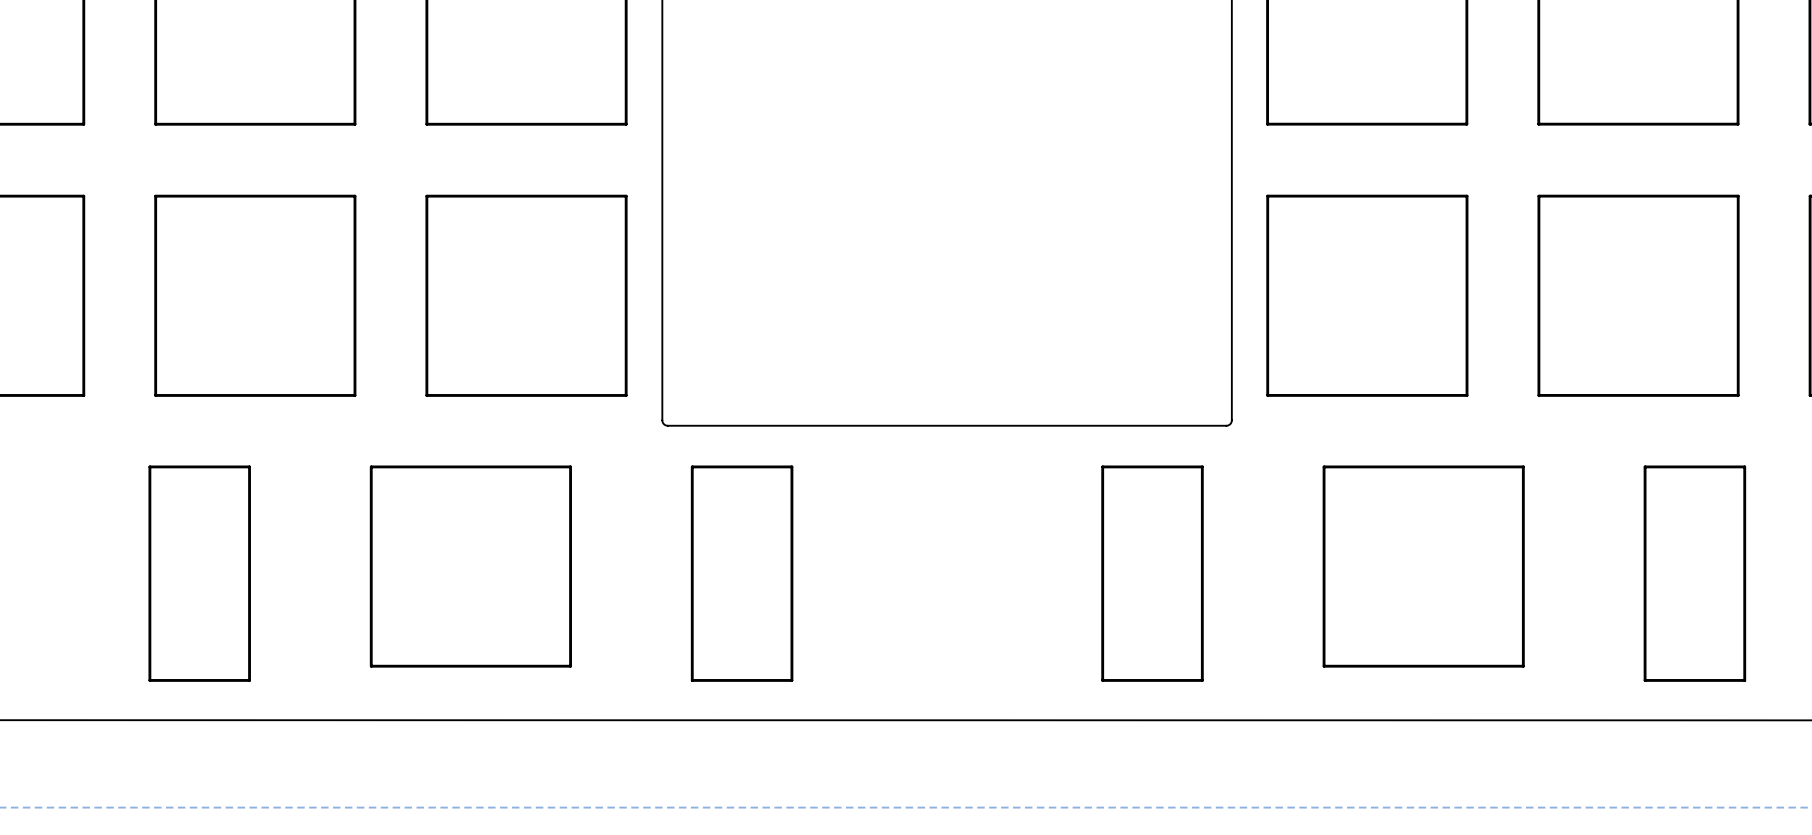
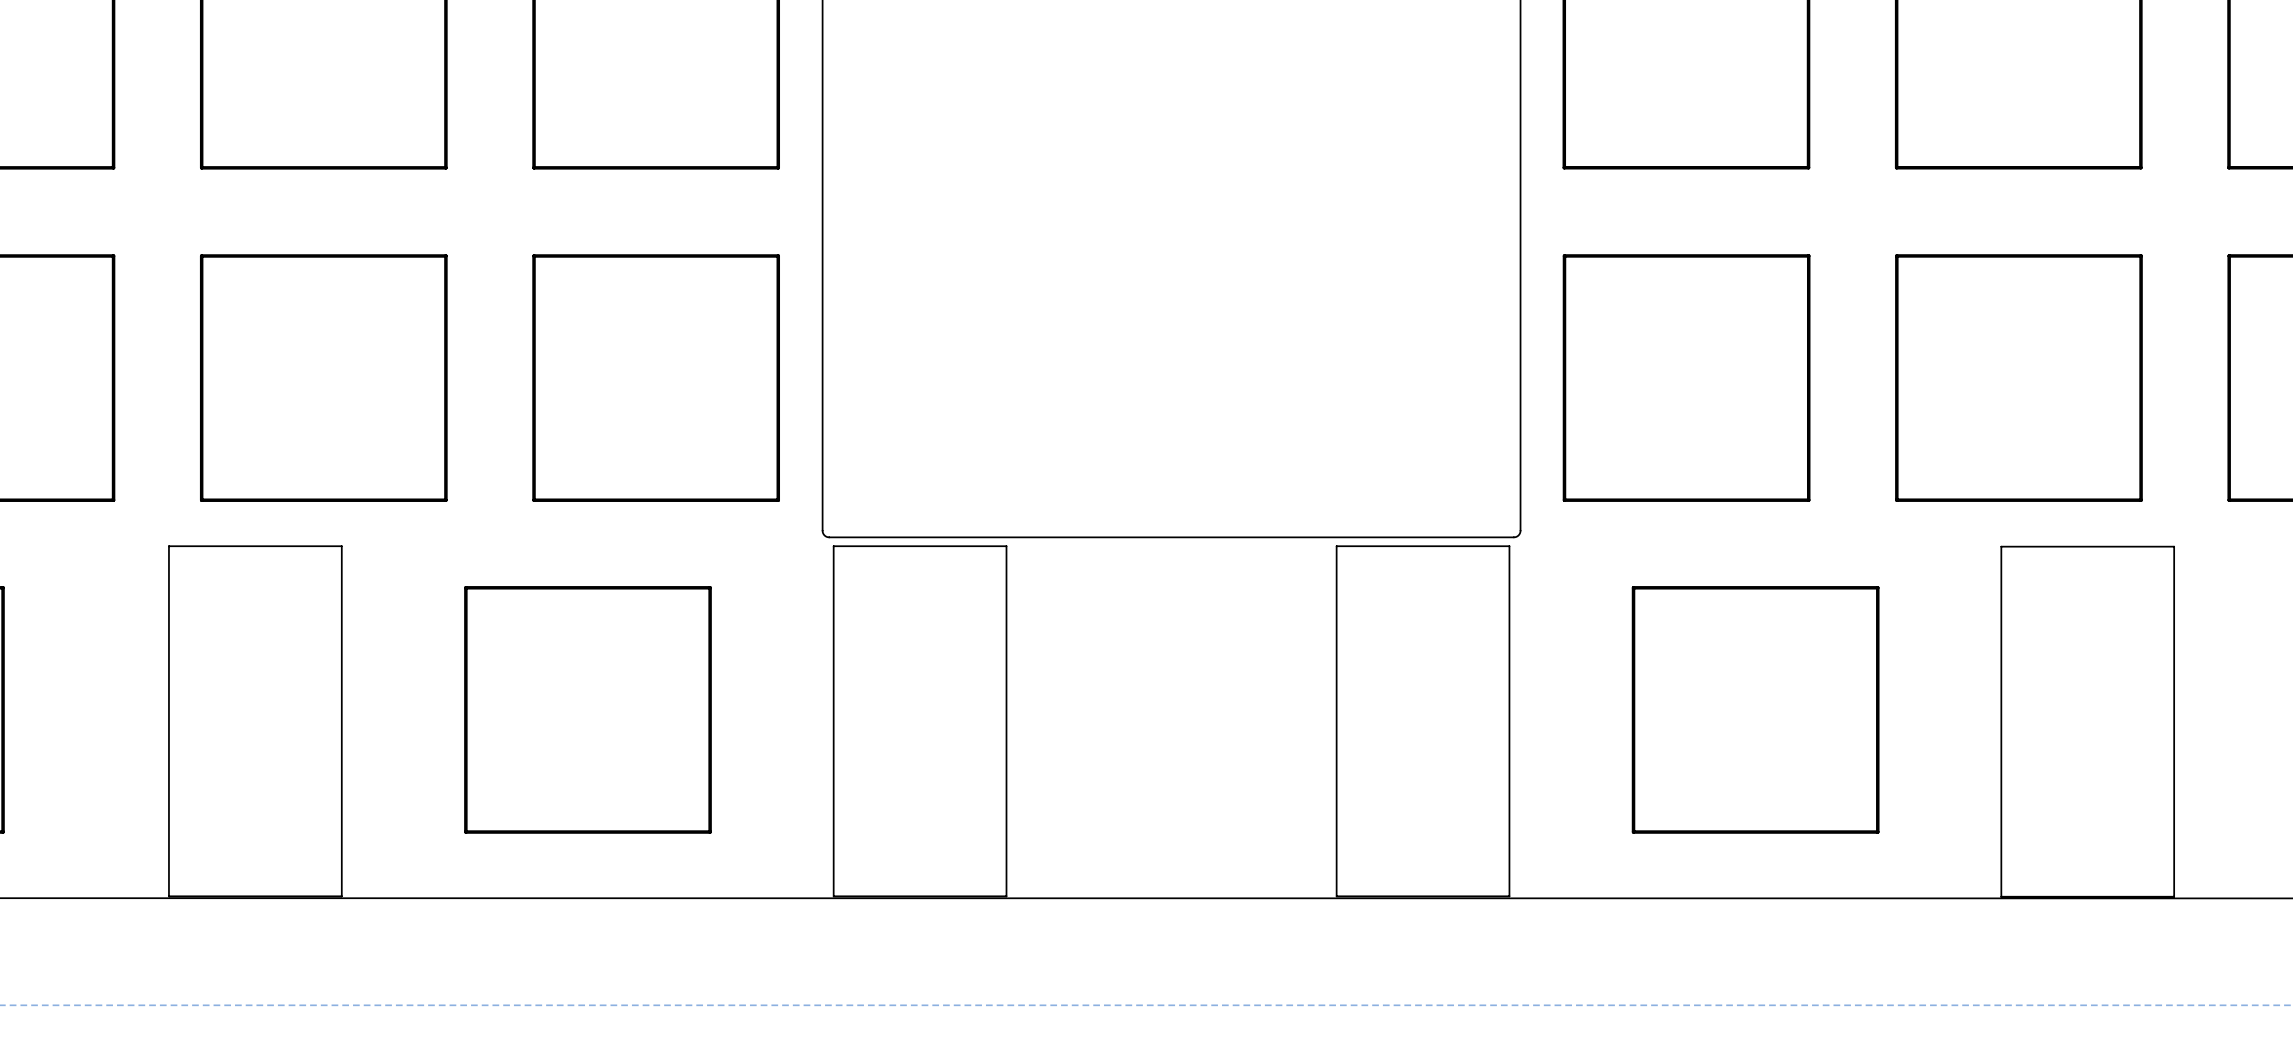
board edge: (249, 466) (149, 466) (149, 680) (249, 680) (249, 466) -> (341, 546) (341, 896) (168, 896) (168, 546) (341, 546)
board edge: (791, 466) (692, 466) (692, 680) (791, 680) (791, 466) -> (1006, 546) (1006, 896) (833, 896) (833, 546) (1006, 546)
board edge: (1202, 466) (1102, 466) (1102, 680) (1202, 680) (1202, 466) -> (1509, 546) (1509, 896) (1336, 896) (1336, 546) (1509, 546)
board edge: (1744, 466) (1645, 466) (1645, 680) (1744, 680) (1744, 466) -> (2174, 546) (2174, 896) (2001, 896) (2001, 546) (2174, 546)

